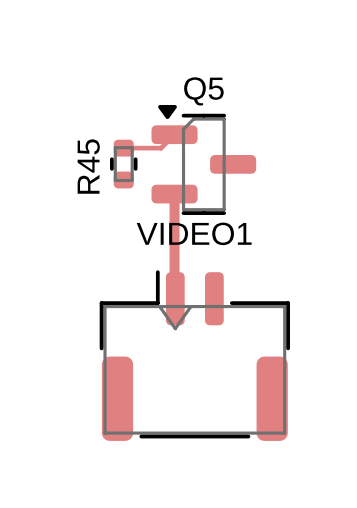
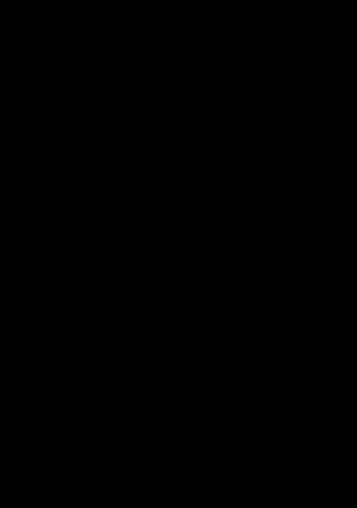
track: (174, 134) (161, 148) (123, 148) -> none
Q5: (203, 160) -> none
R45: (123, 164) -> none
track: (174, 194) (175, 298) -> none
VIDEO1: (194, 355) -> none

